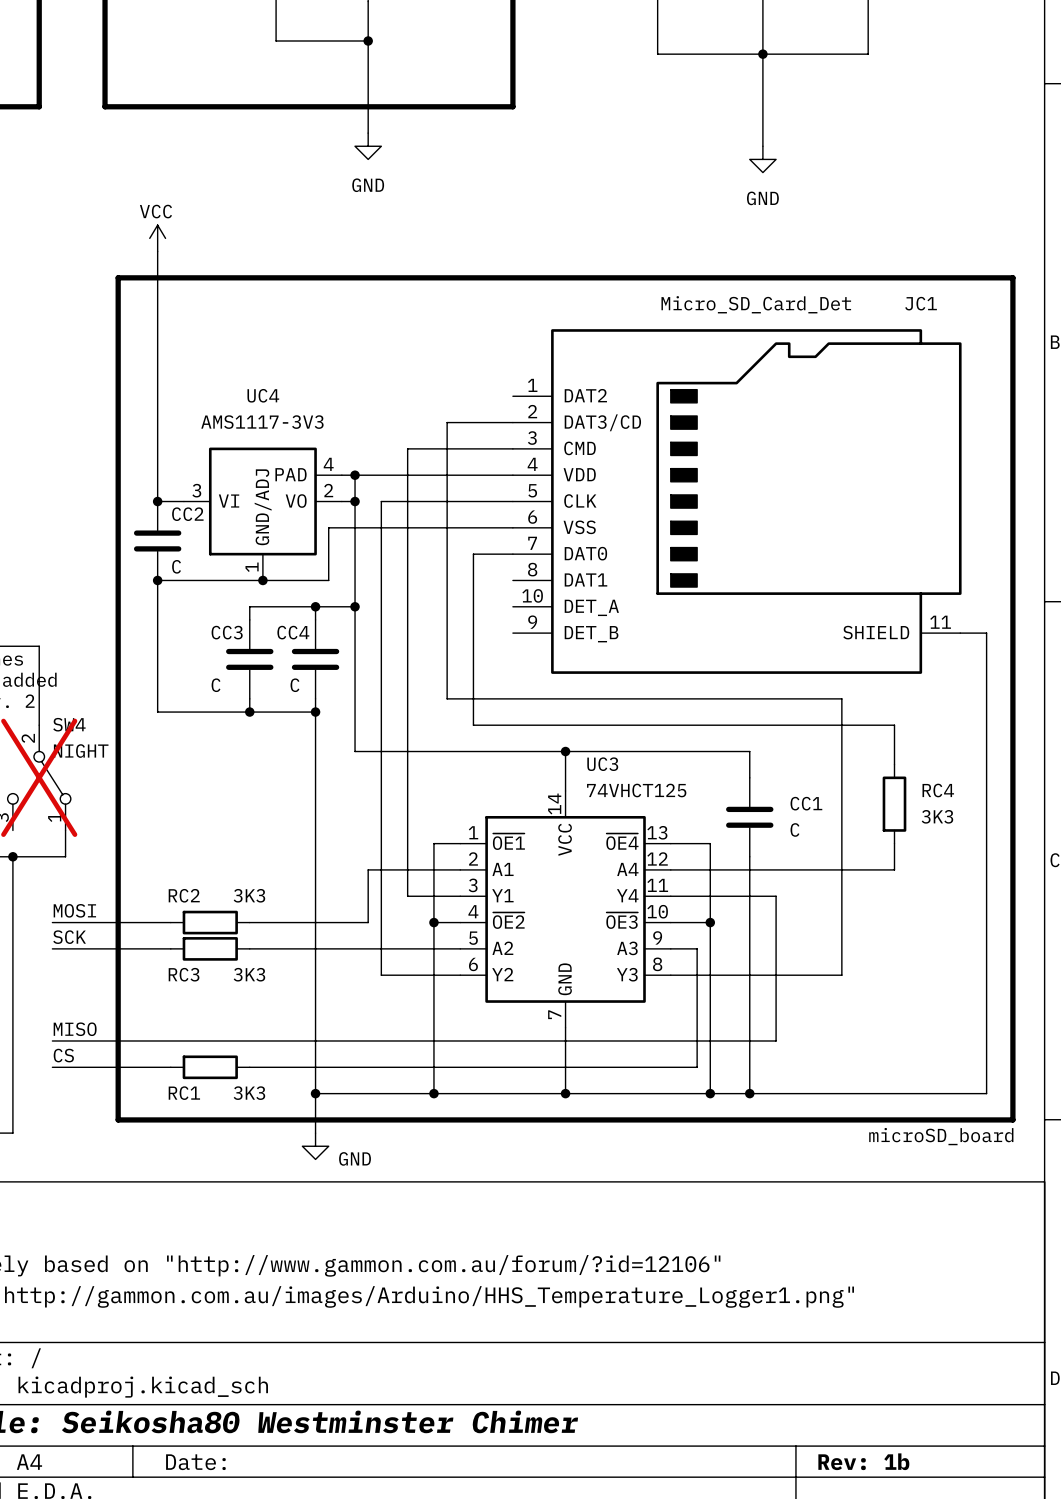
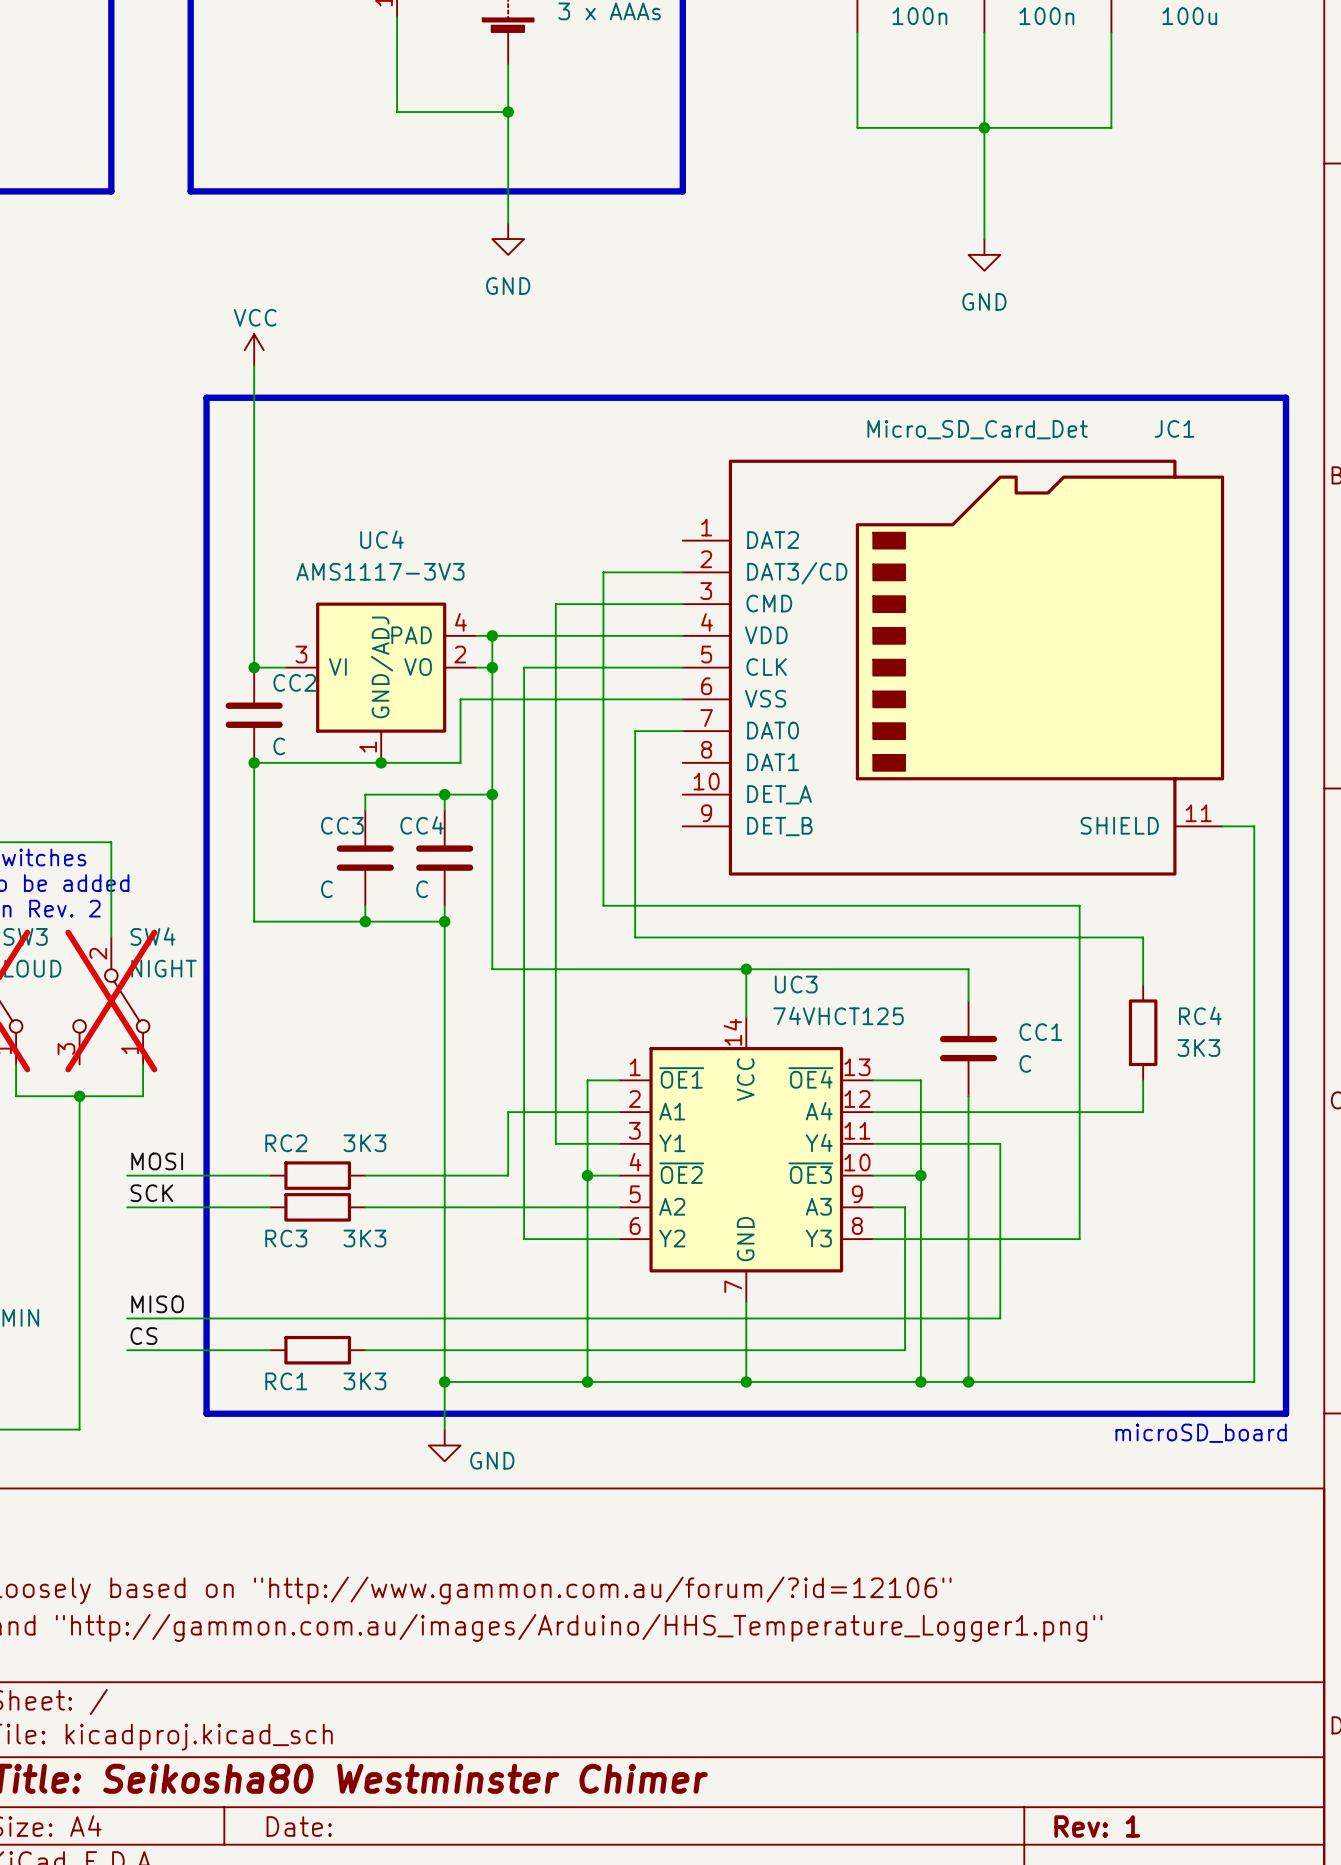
title block: Rev: 1b (863, 1461) -> Rev: 1 (1097, 1826)

